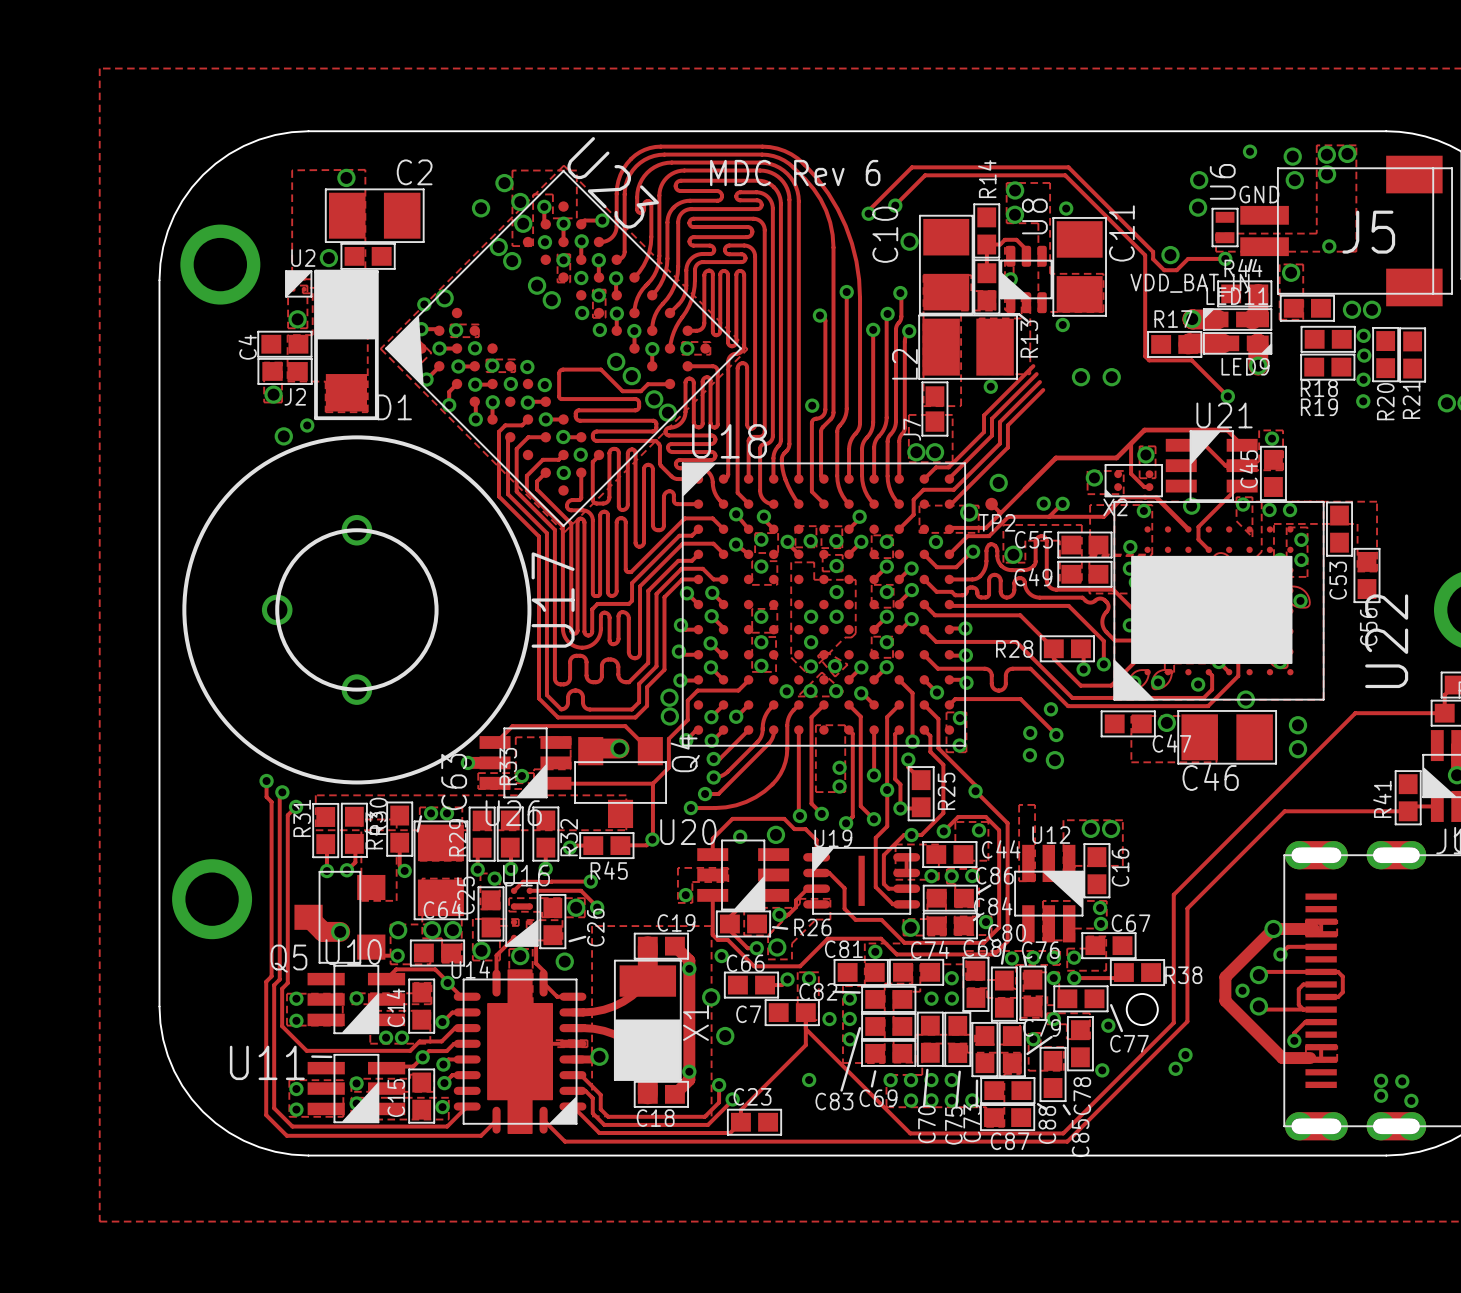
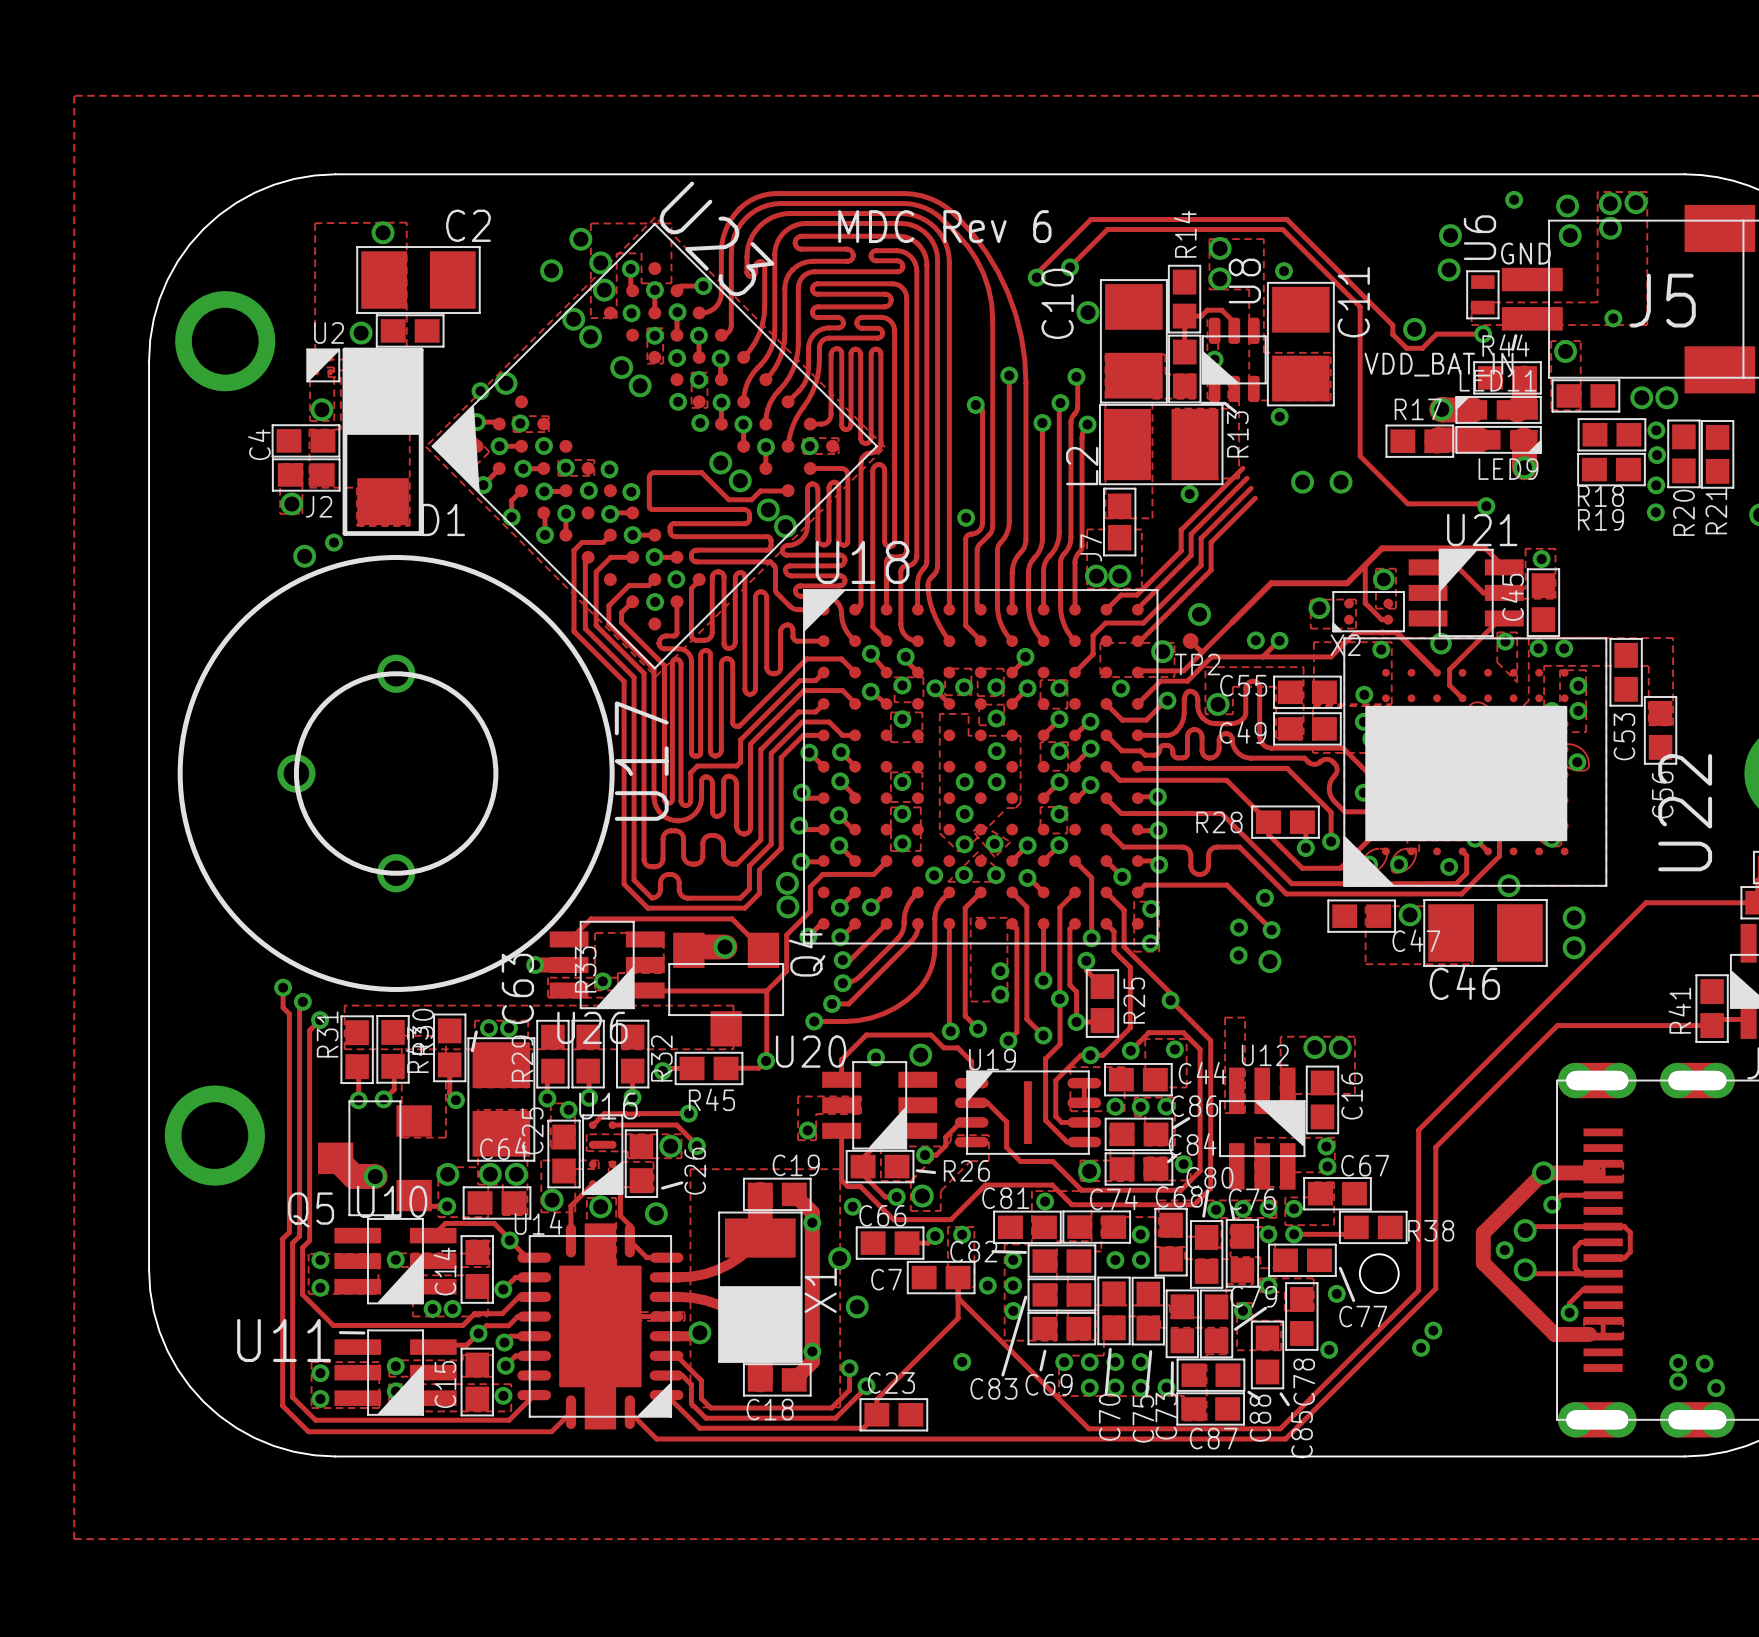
track: (1127, 237) (1145, 255) (1145, 356) (1149, 360) (1191, 360) (1225, 394) -> (1360, 306) (1360, 456) (1407, 503) (1484, 503)

